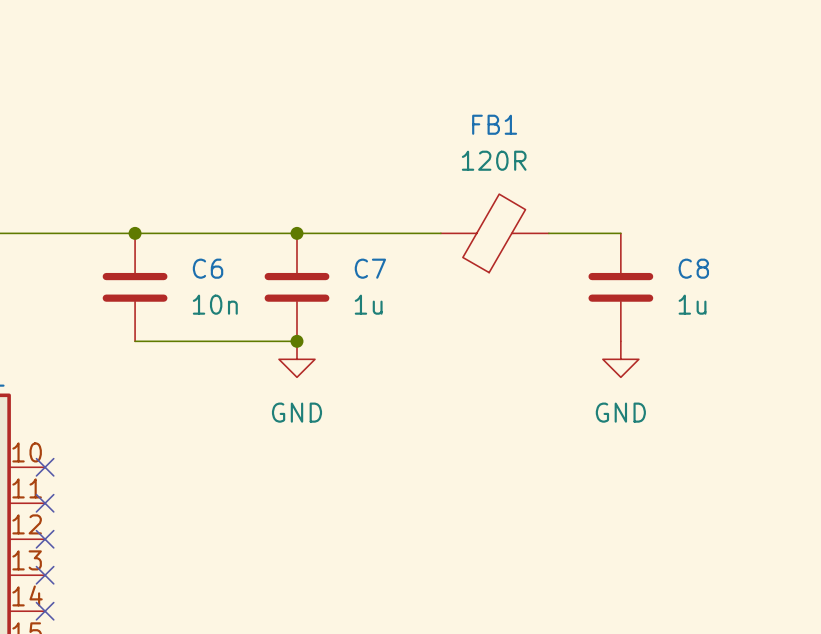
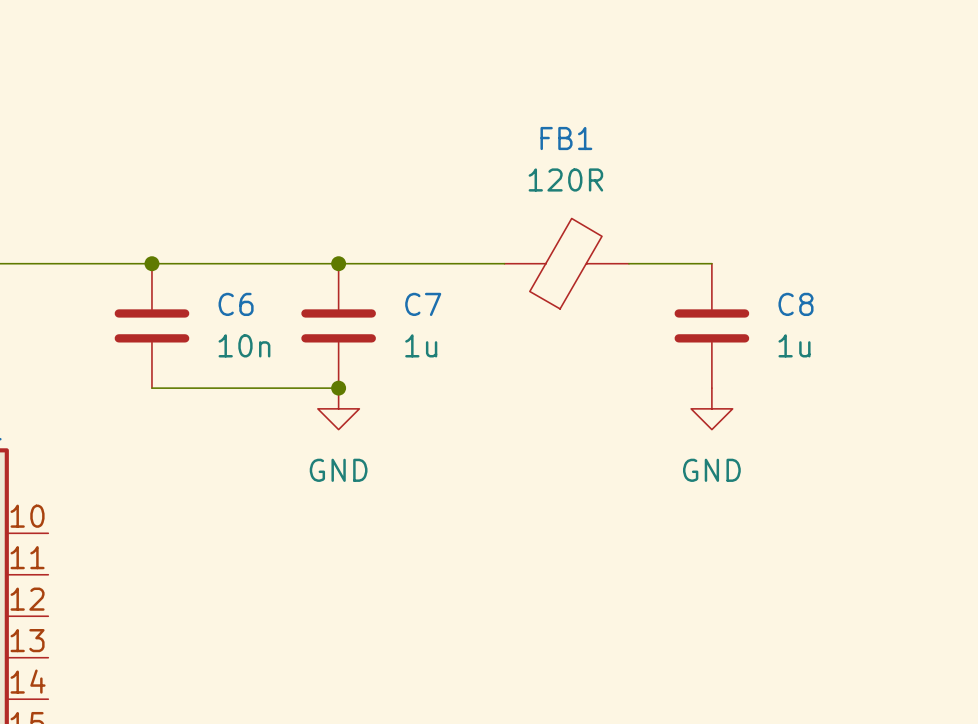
no-connect mark: (45, 467) -> none
no-connect mark: (45, 503) -> none
no-connect mark: (45, 539) -> none
no-connect mark: (45, 575) -> none
no-connect mark: (45, 611) -> none

